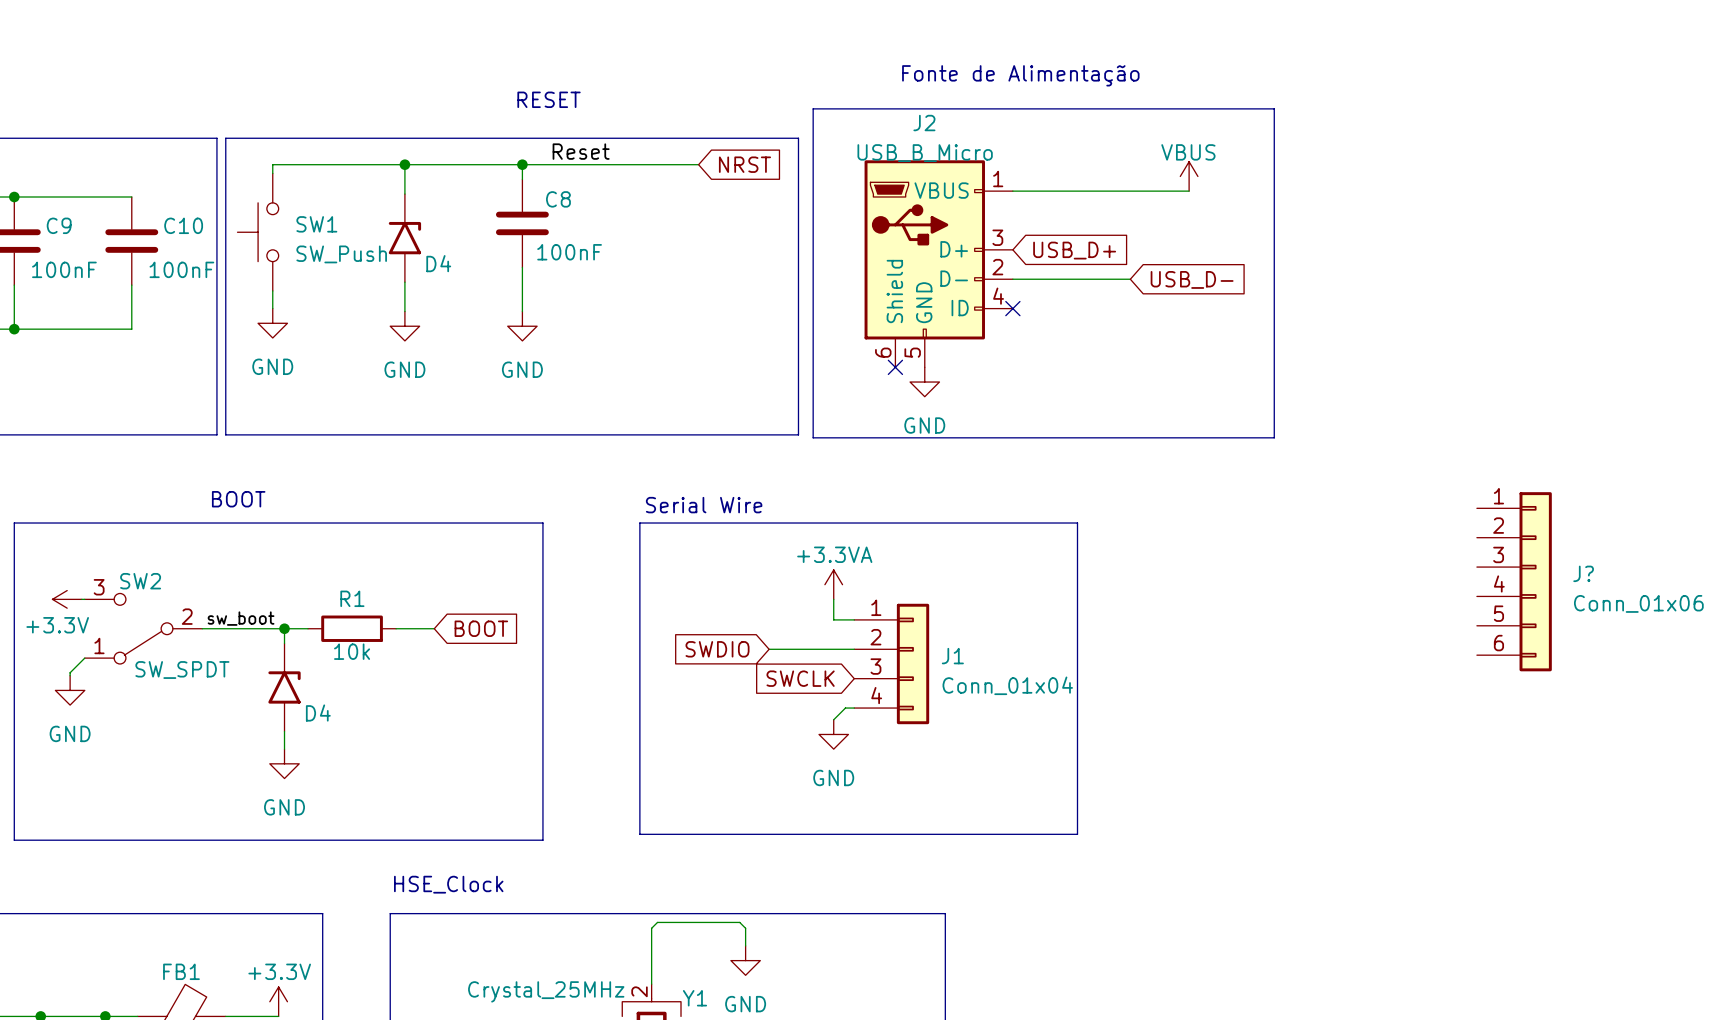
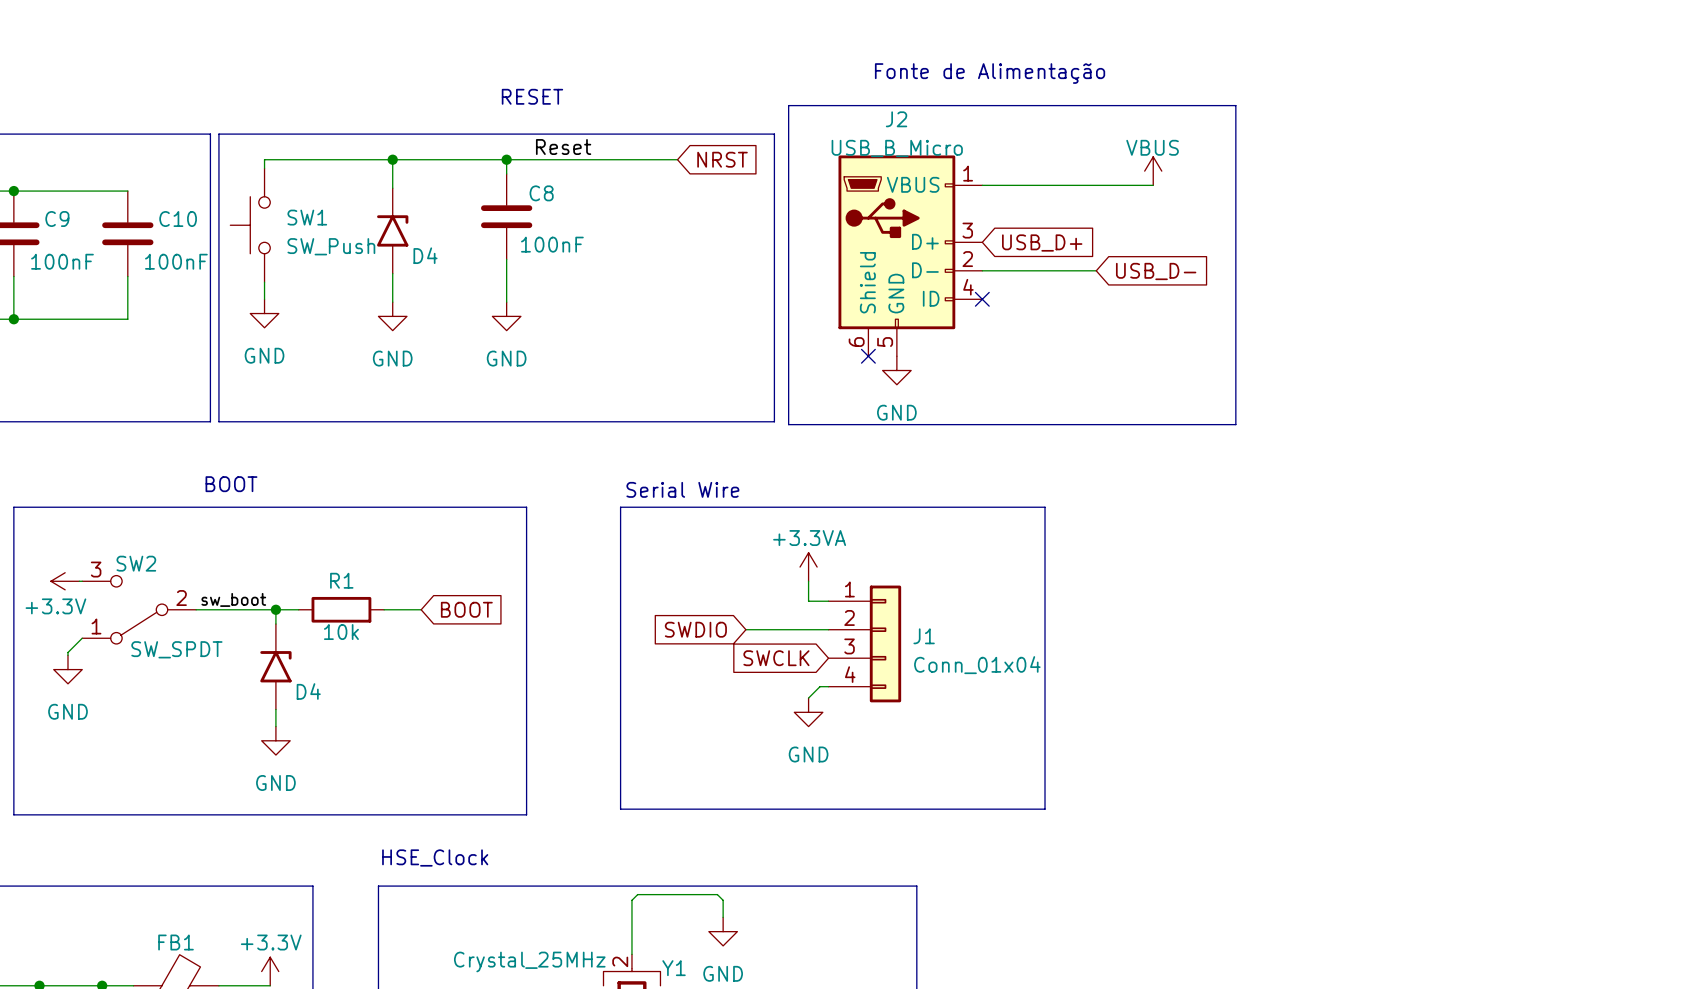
J?: Conn_01x06 (1514, 581) -> none

